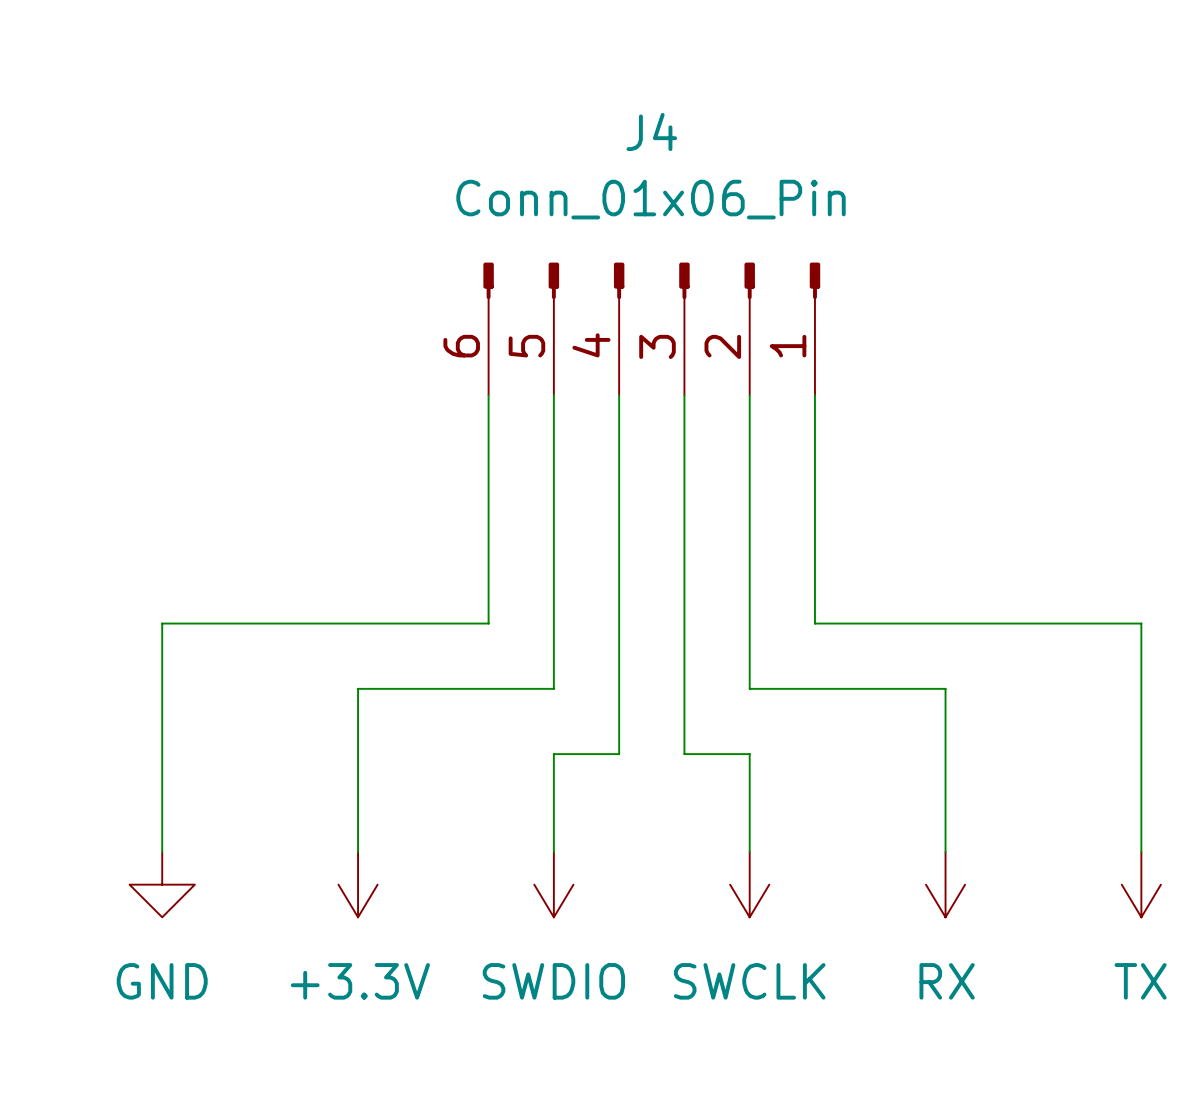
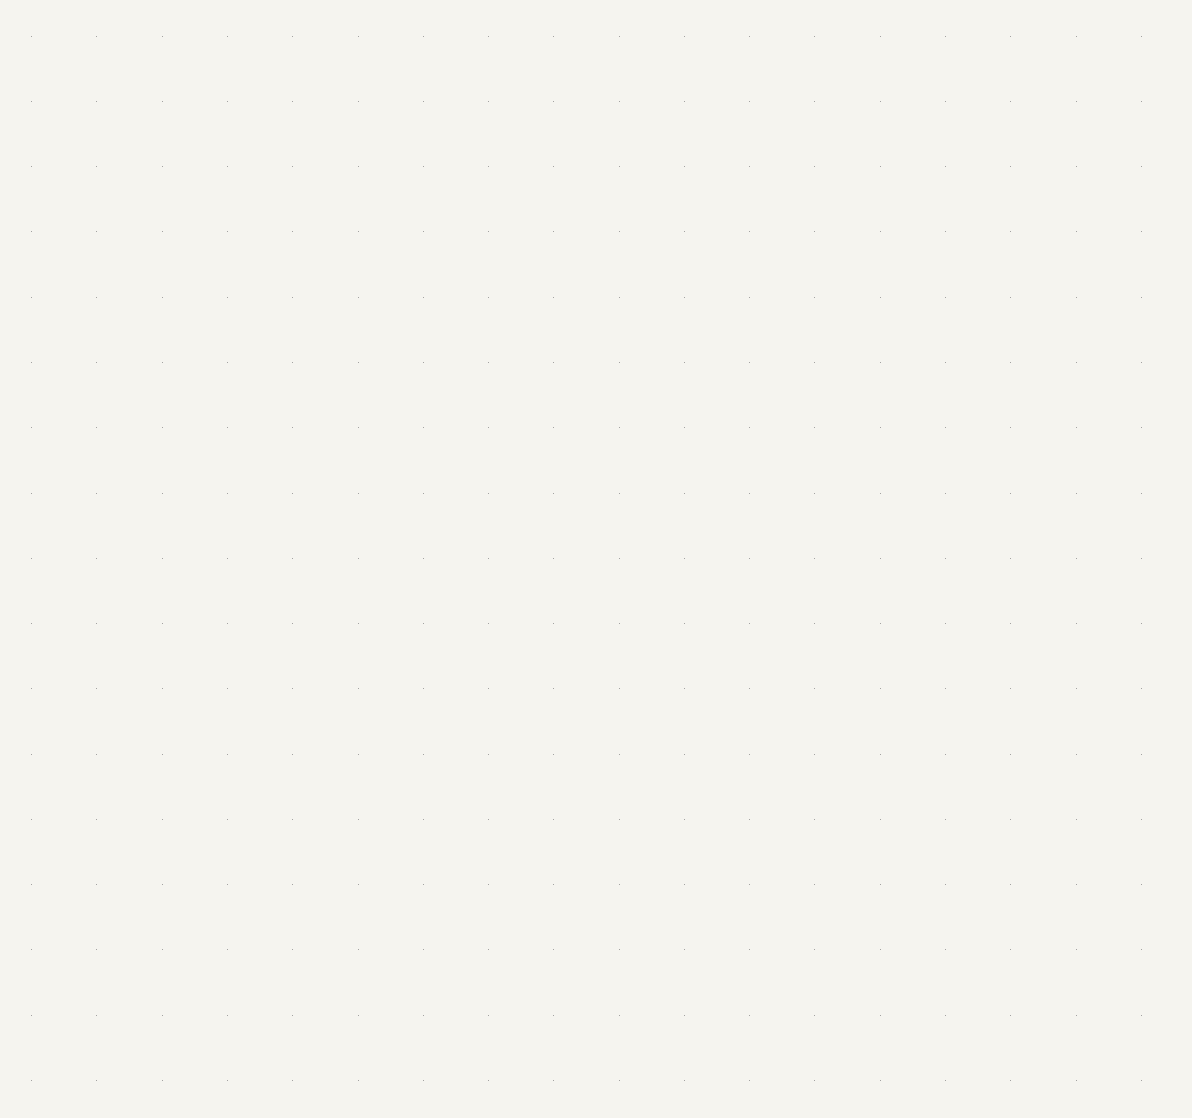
J4: Conn_01x06_Pin (651, 328) -> none
wire: (488, 395) (488, 623) (162, 623) (162, 852) -> none
wire: (553, 395) (553, 688) (358, 688) (358, 852) -> none
wire: (619, 395) (619, 754) (553, 754) (553, 852) -> none
wire: (684, 395) (684, 754) (749, 754) (749, 852) -> none
wire: (749, 395) (749, 688) (945, 688) (945, 852) -> none
wire: (814, 395) (814, 623) (1141, 623) (1141, 852) -> none
power symbol: GND (162, 884) -> none
power symbol: +3.3V (358, 884) -> none
power symbol: SWDIO (553, 884) -> none
power symbol: SWCLK (749, 884) -> none
power symbol: RX (945, 884) -> none
power symbol: TX (1141, 884) -> none

